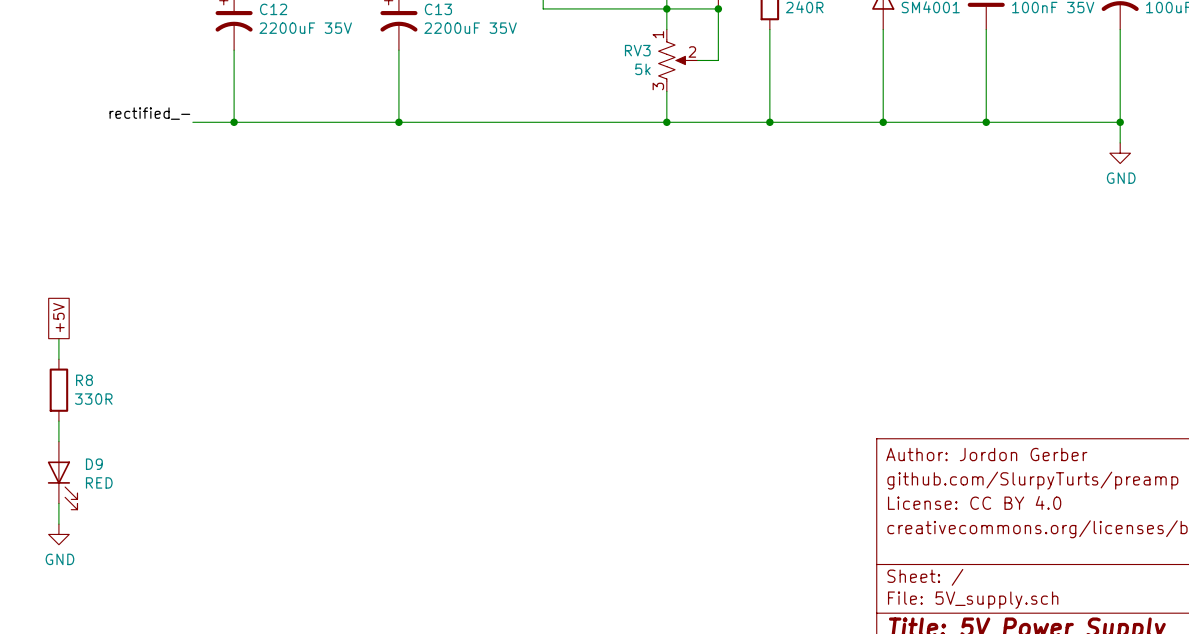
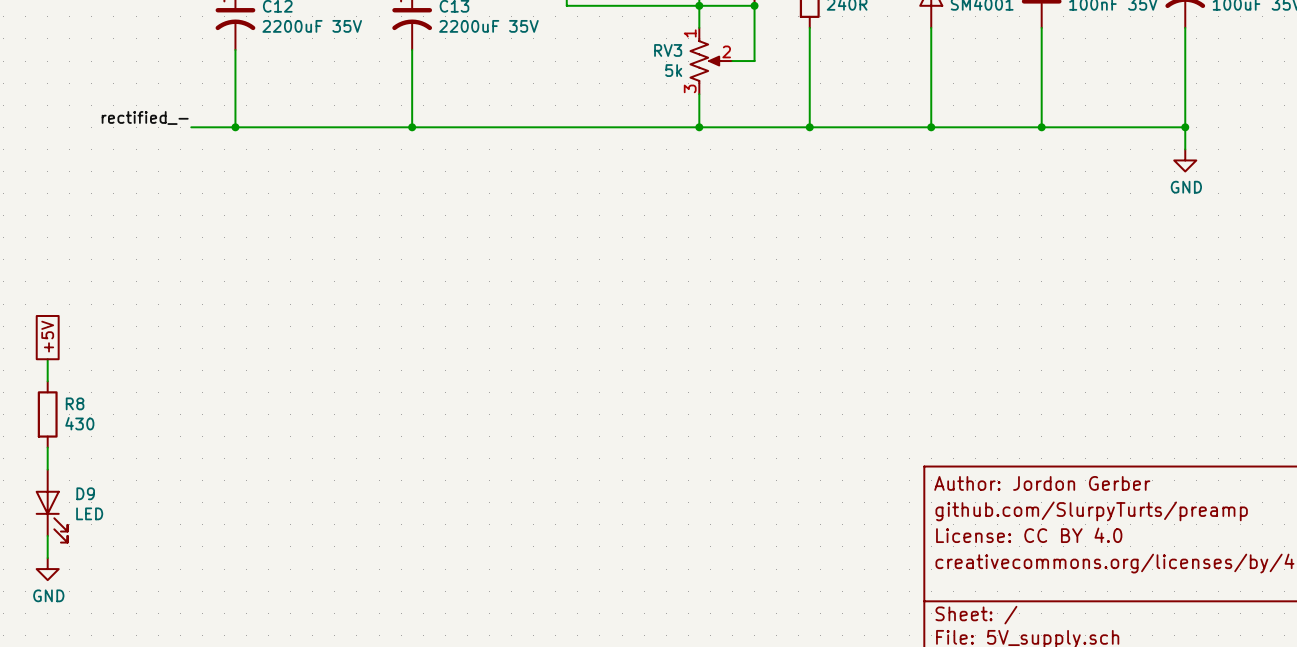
R8 value: 330R (93, 399) -> 430 (79, 423)
D9 value: RED (99, 482) -> LED (89, 513)

